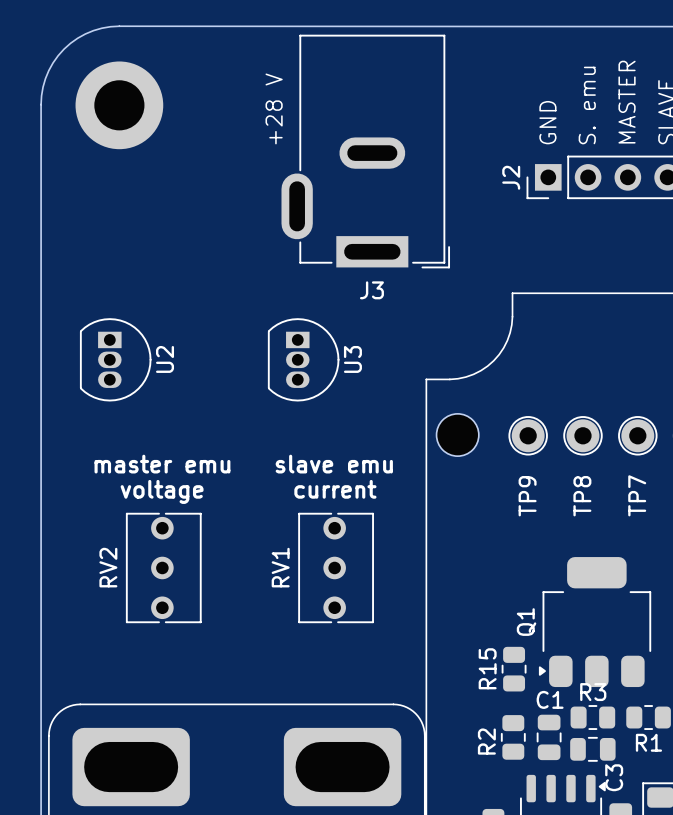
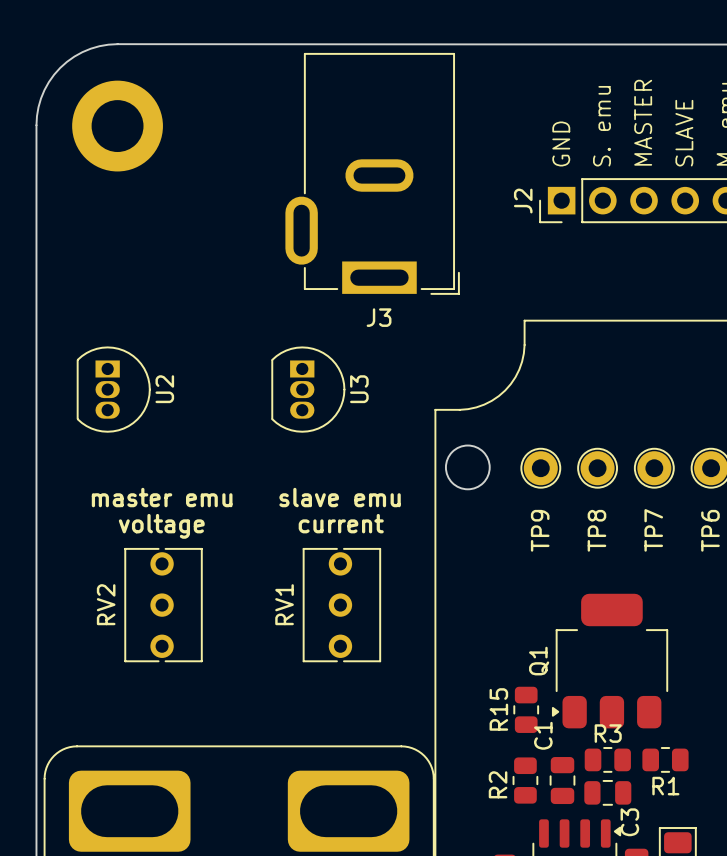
text: +28 V (274, 108) -> none
C1 name rotation: 0° (550, 699) -> 90° counterclockwise (543, 735)

